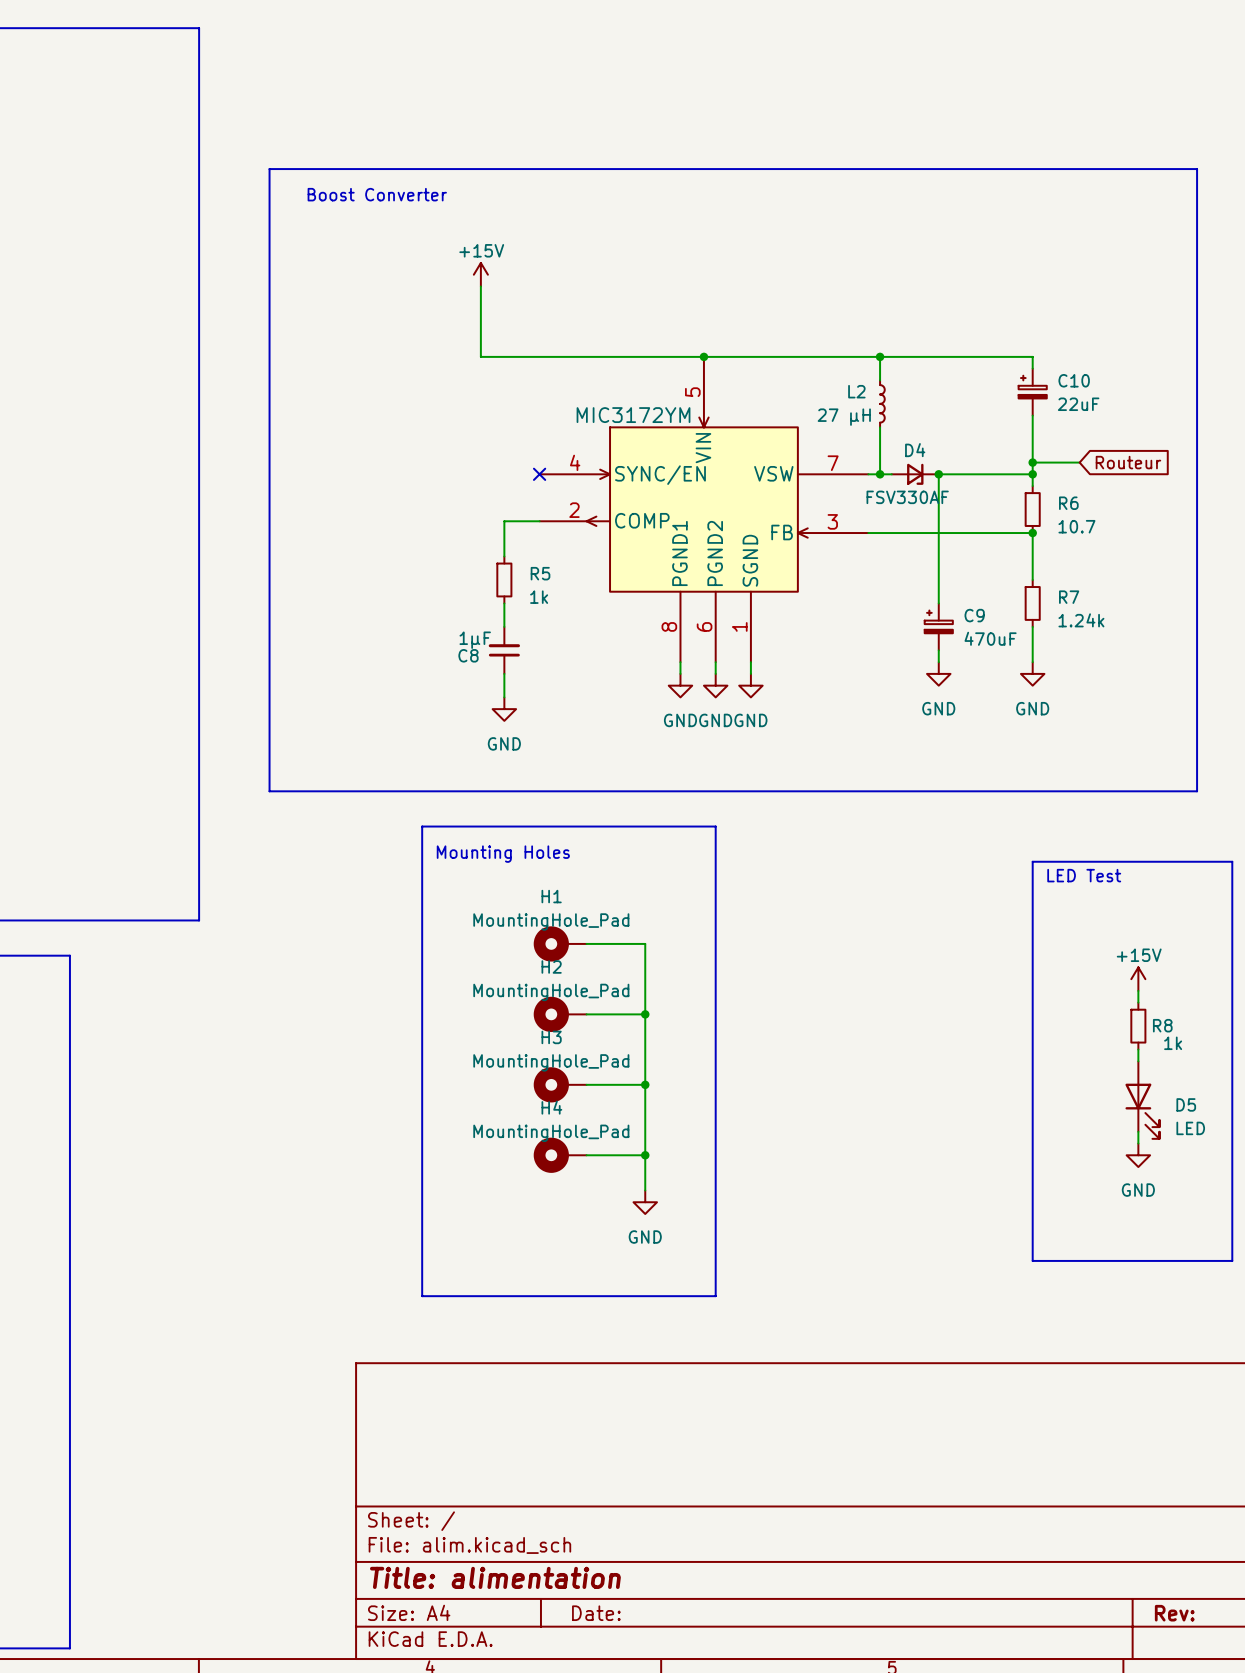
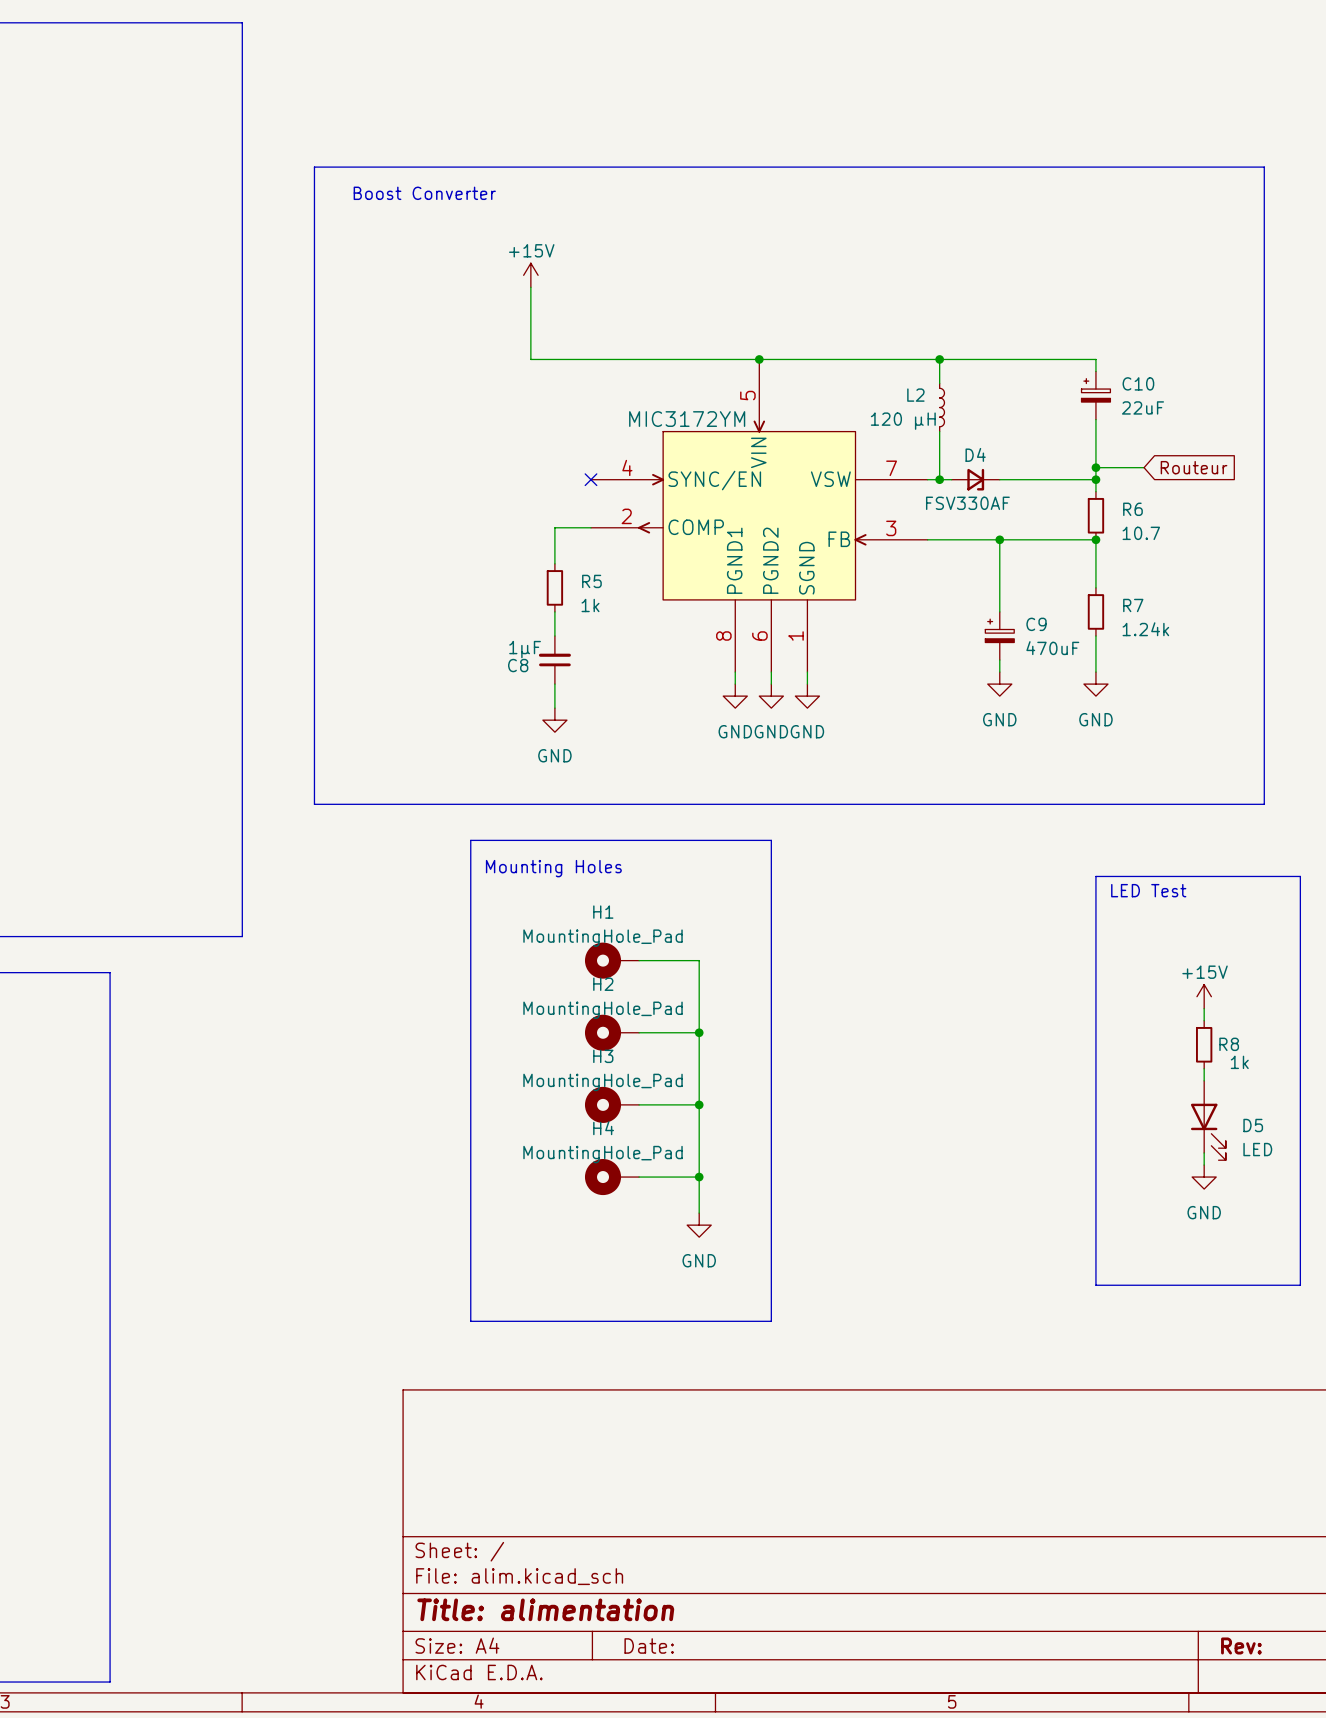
L2 value: 27 µH (844, 417) -> 120 µH (903, 421)
wire: (938, 474) (938, 533) -> none
junction: (938, 474) -> none
junction: none -> (999, 539)

